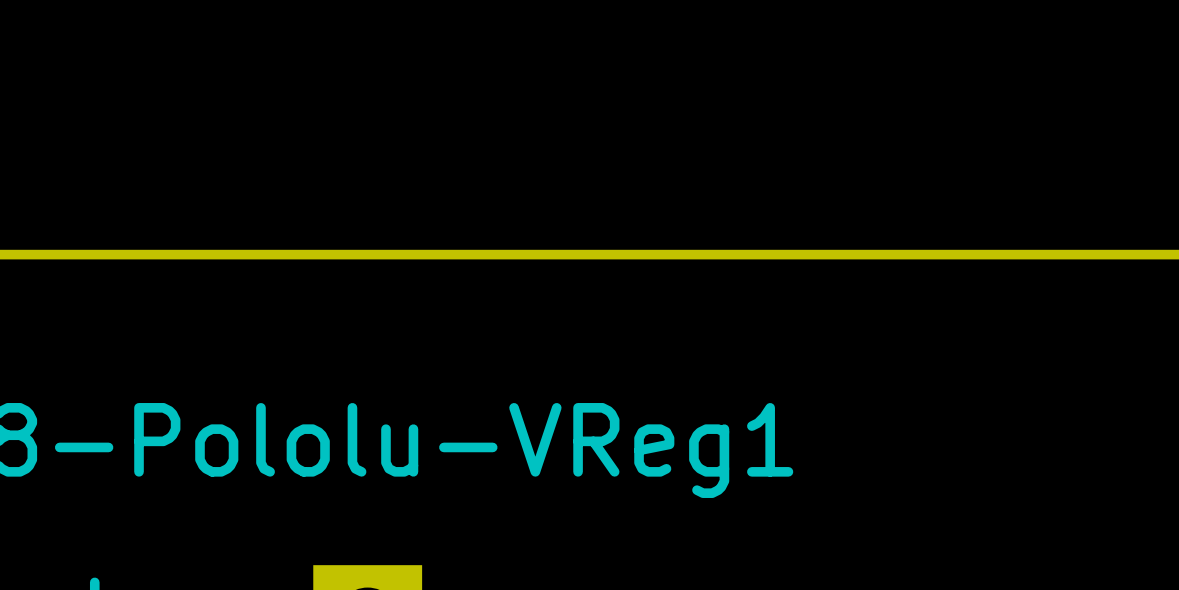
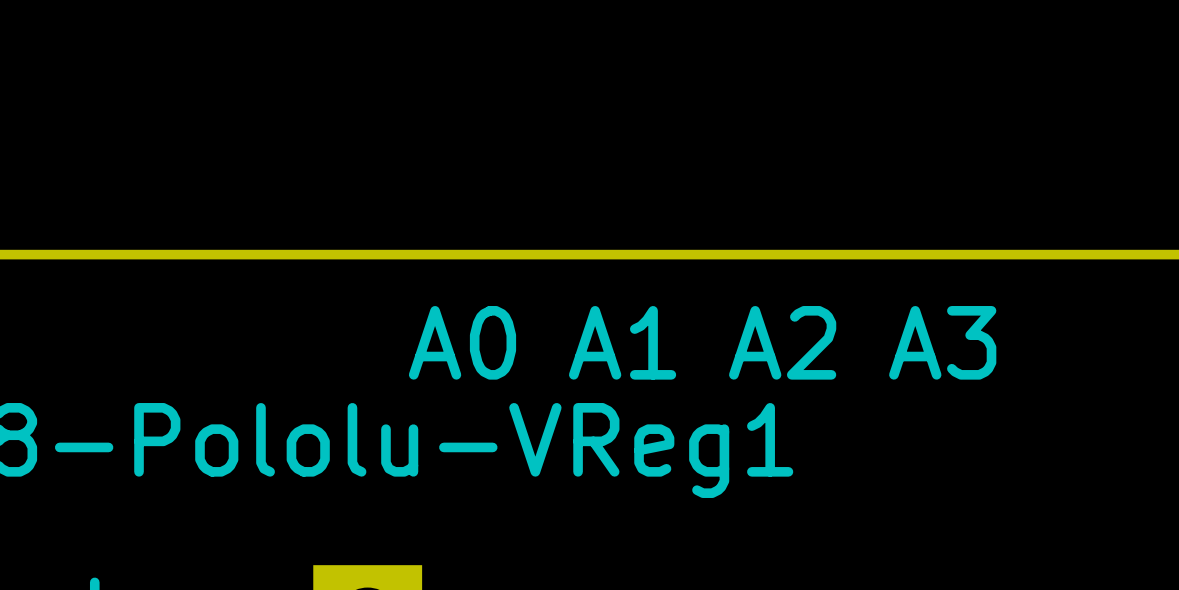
text: none -> A0 (462, 342)
text: none -> A1 (622, 342)
text: none -> A2 (782, 342)
text: none -> A3 (942, 342)

